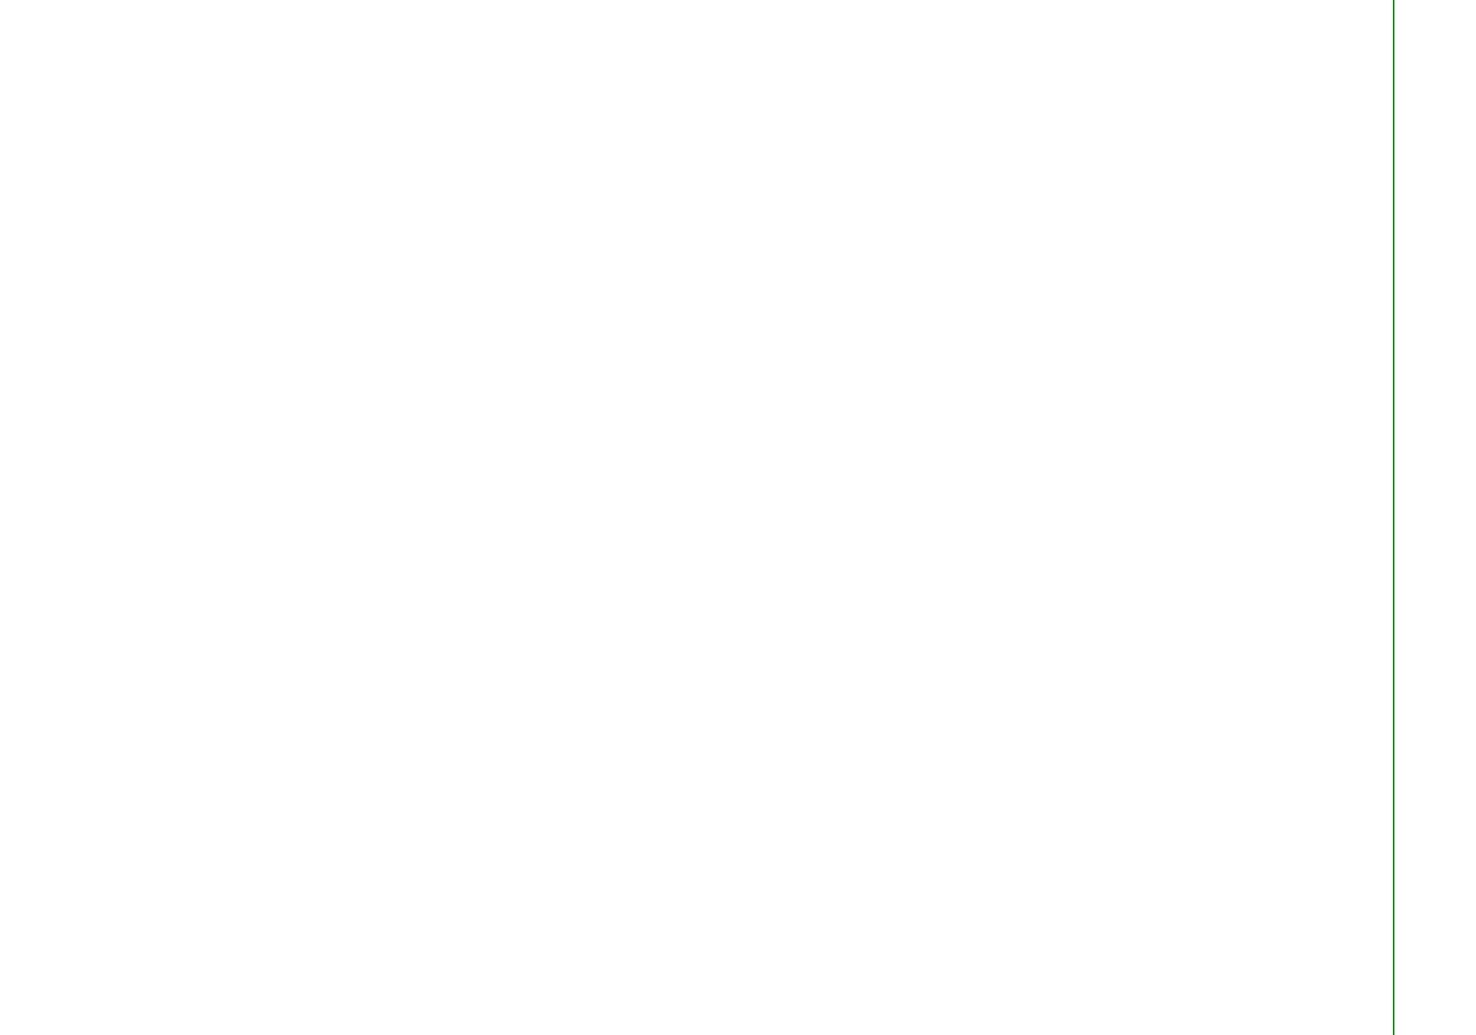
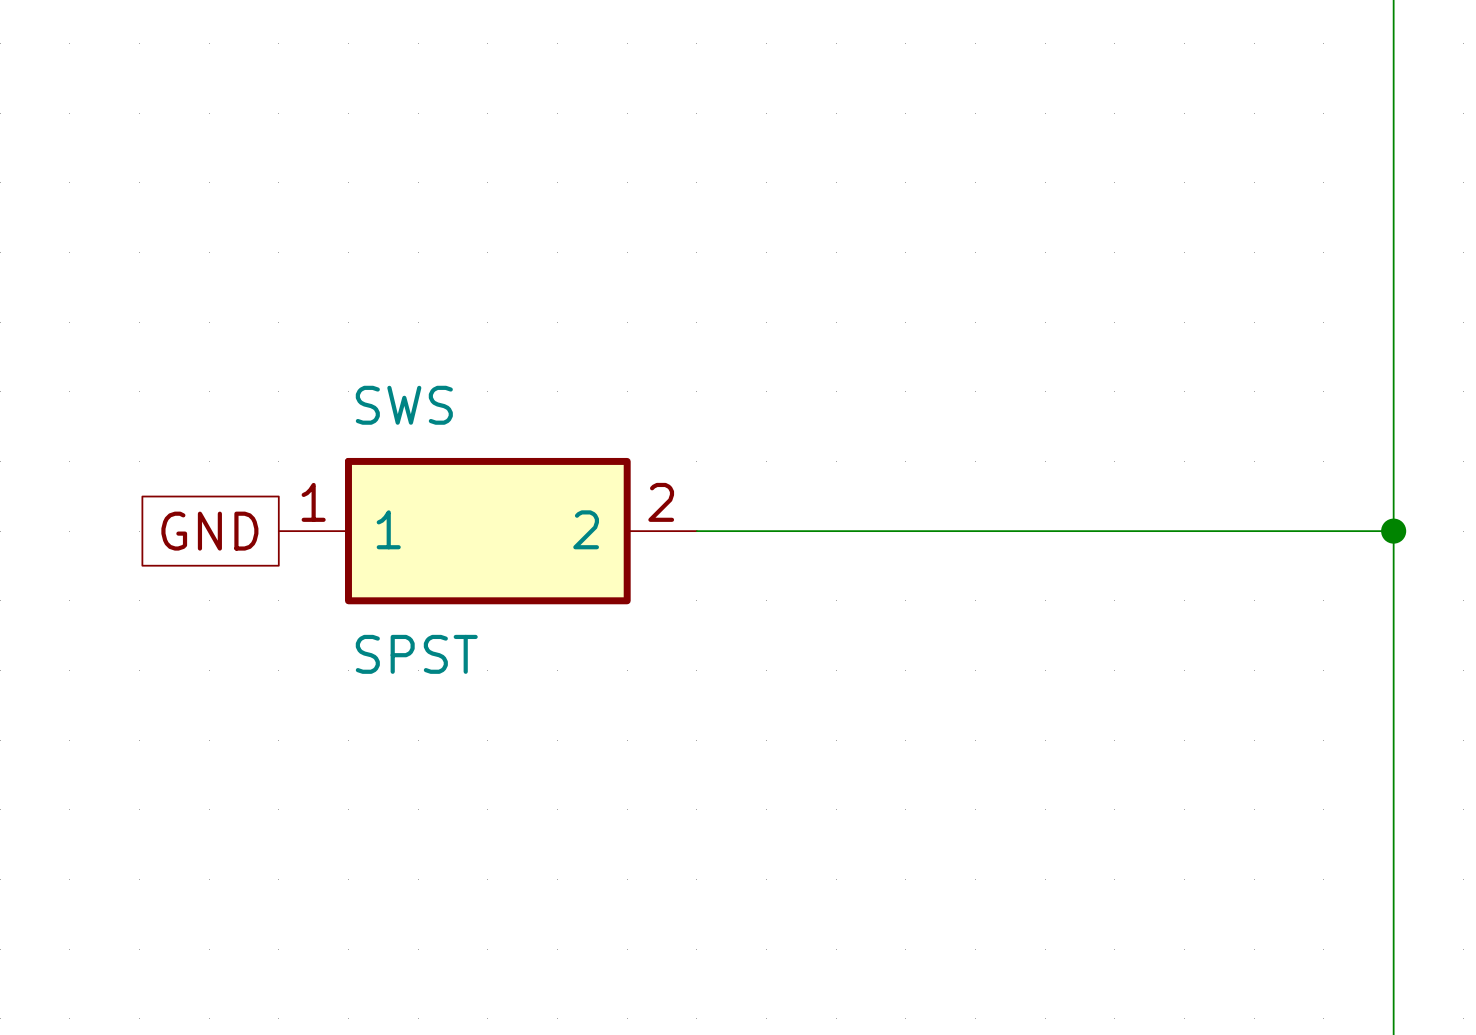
global label: none -> GND (209, 531)
SWS: none -> SPST (487, 531)
wire: none -> (696, 531) (1393, 531)
junction: none -> (1393, 531)

